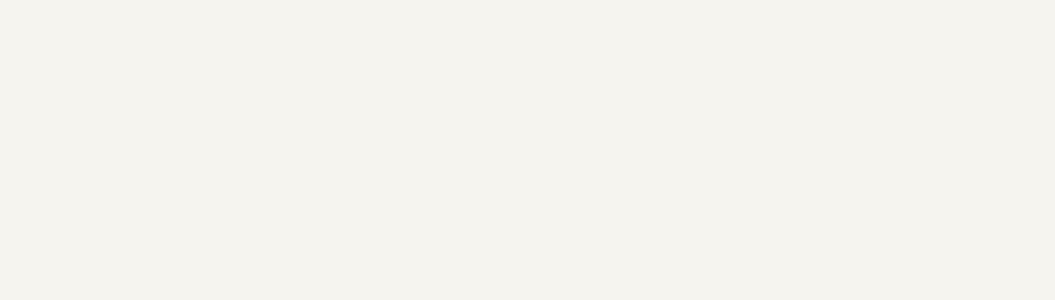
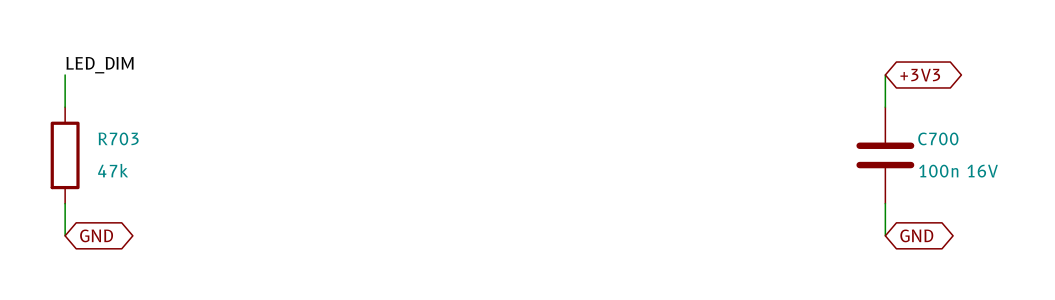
label: none -> LED_DIM (99, 65)
wire: none -> (65, 75) (65, 107)
wire: none -> (885, 75) (885, 107)
global label: none -> +3V3 (920, 75)
R703: none -> 47k (65, 155)
C700: none -> 100n 16V (885, 155)
wire: none -> (65, 203) (65, 235)
wire: none -> (885, 203) (885, 235)
global label: none -> GND (96, 235)
global label: none -> GND (916, 235)

